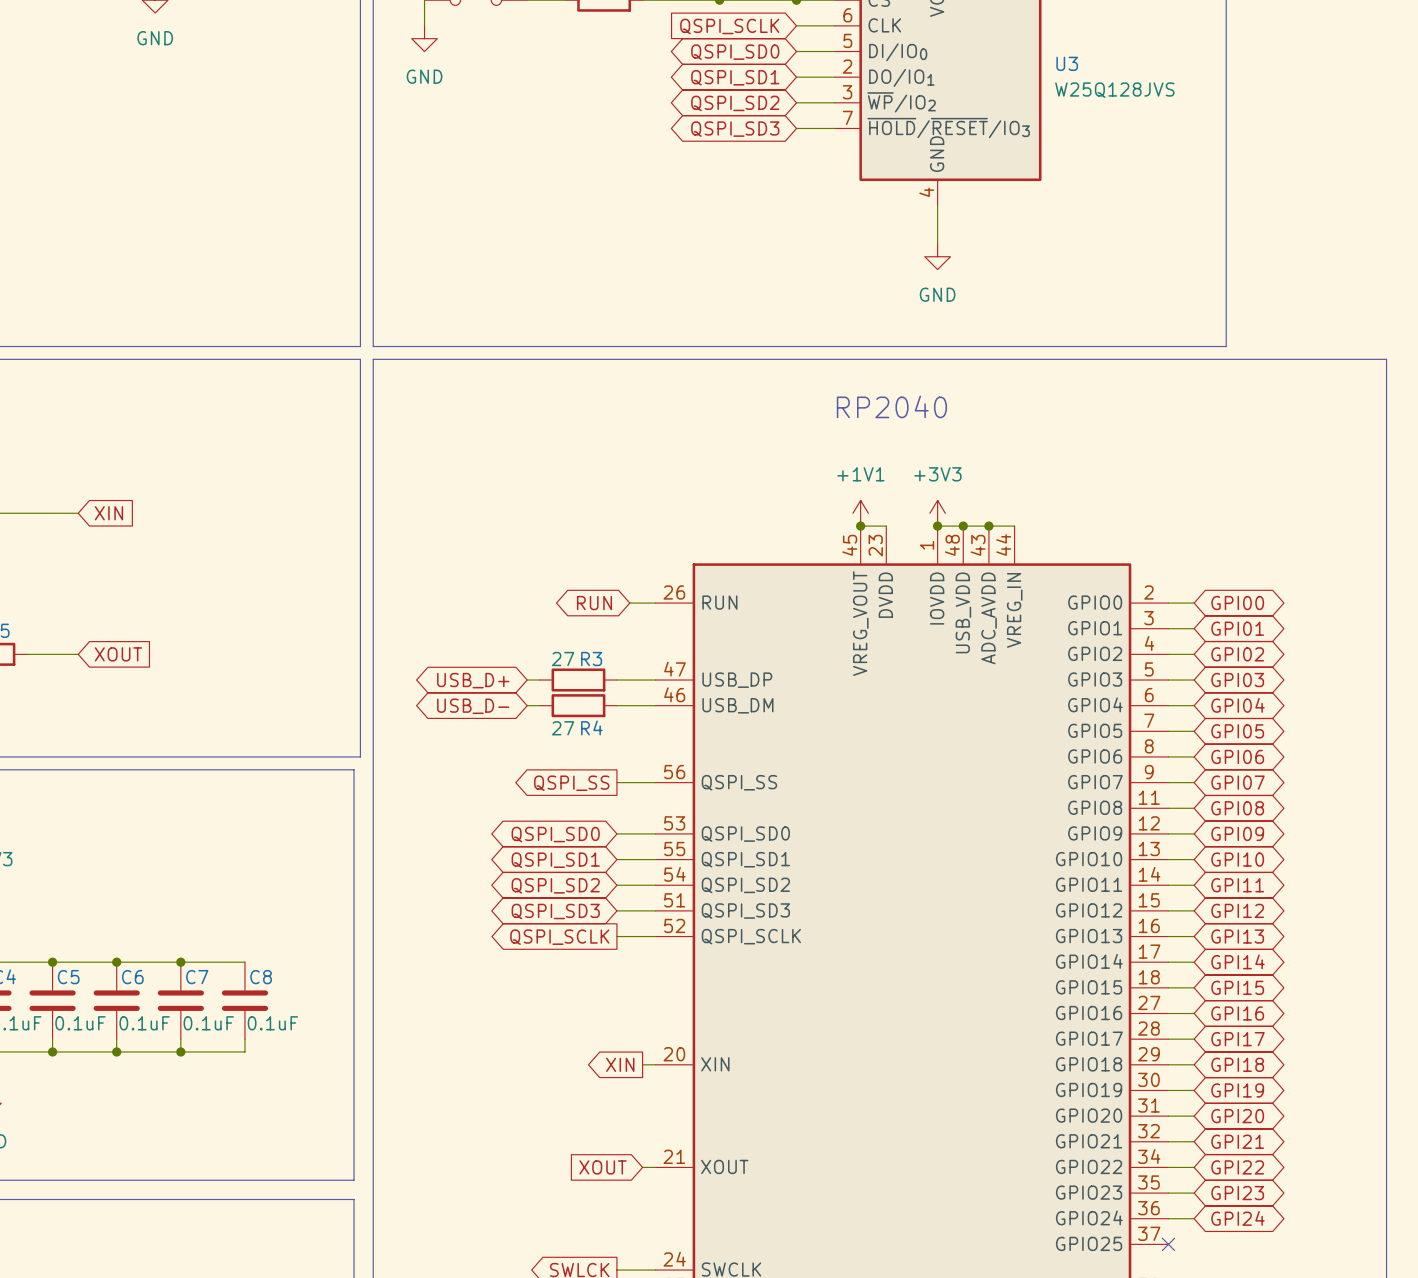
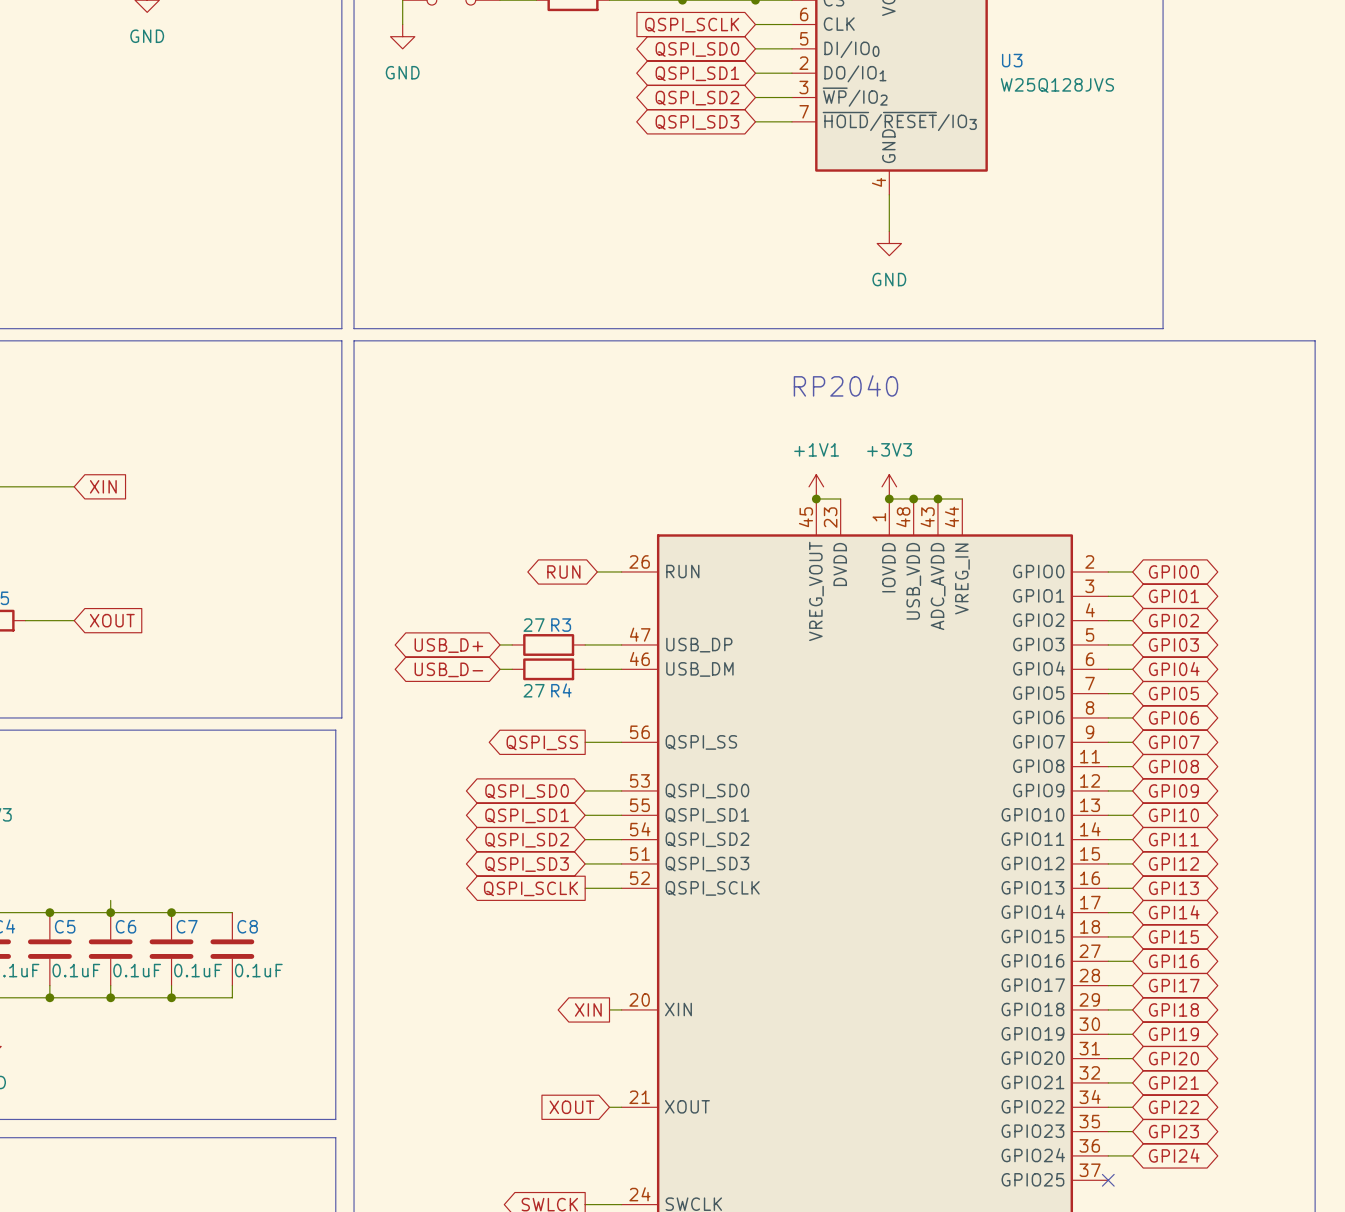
wire: none -> (110, 900) (110, 912)

